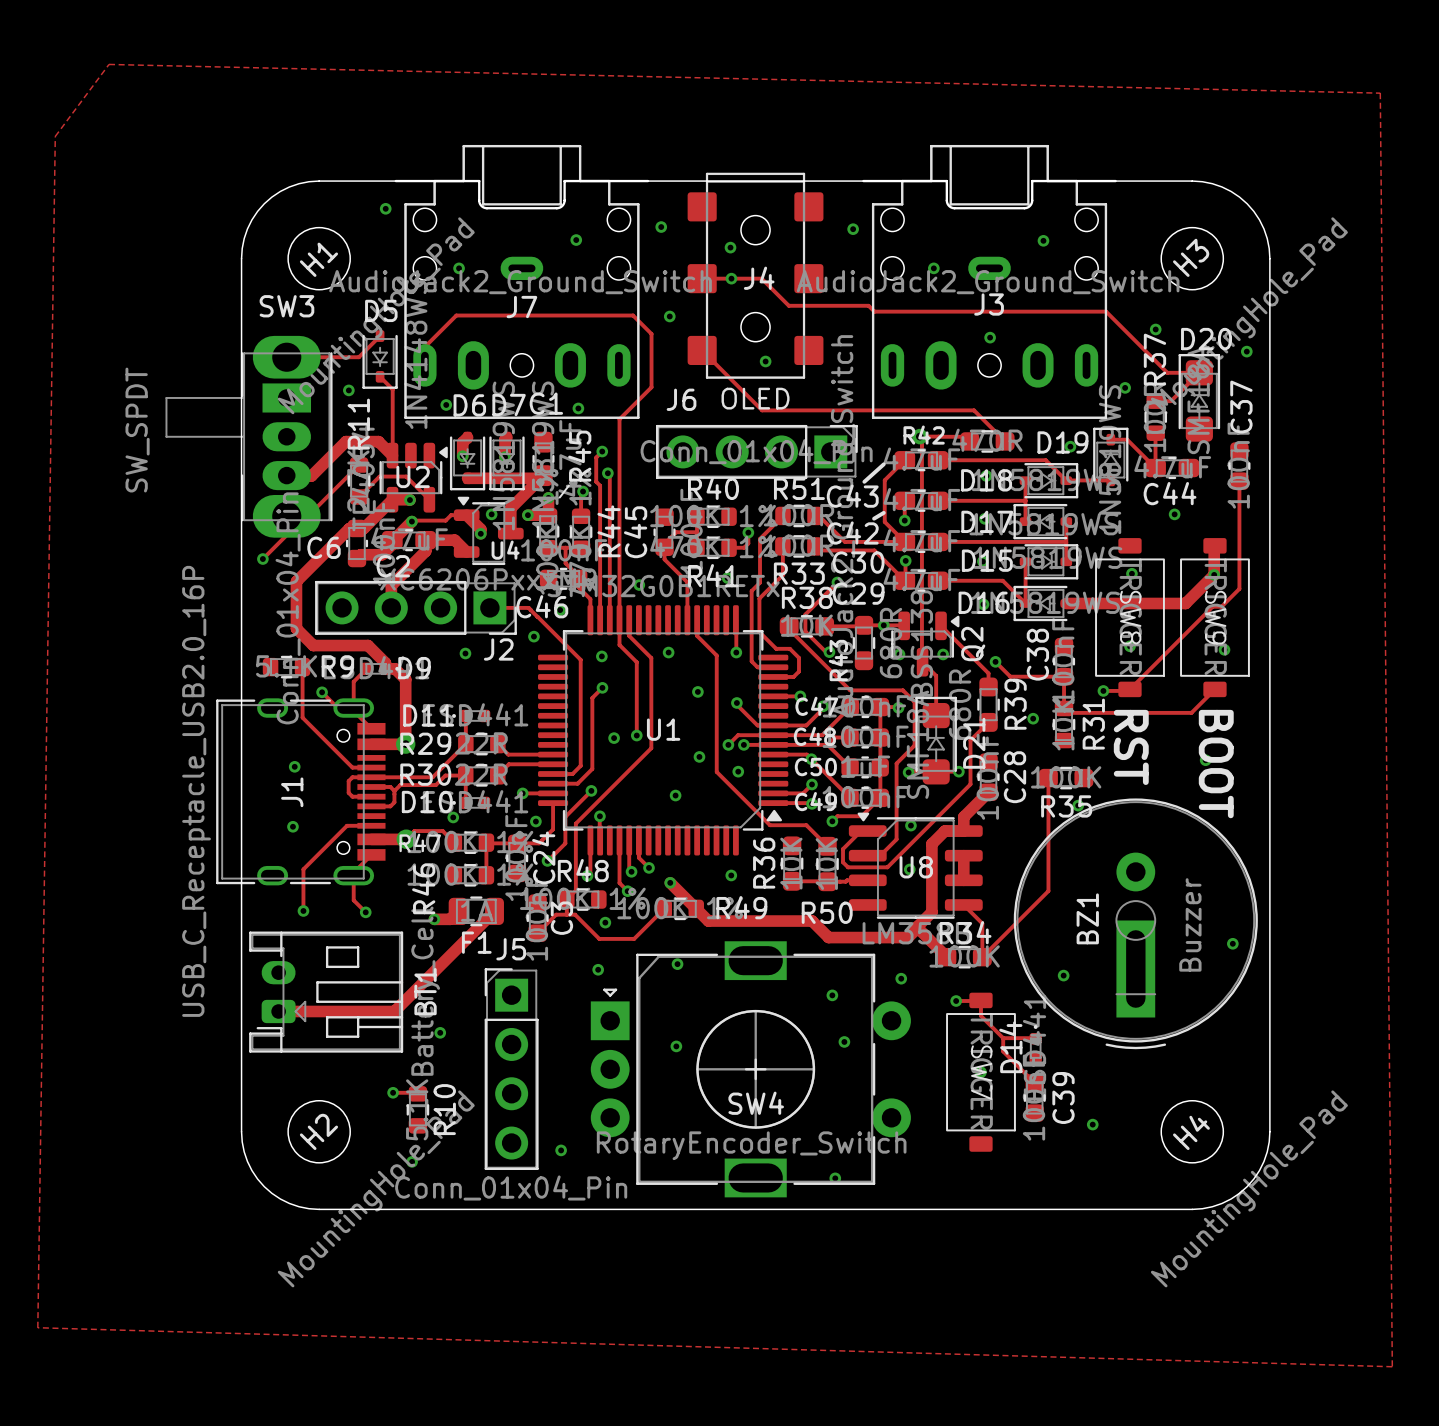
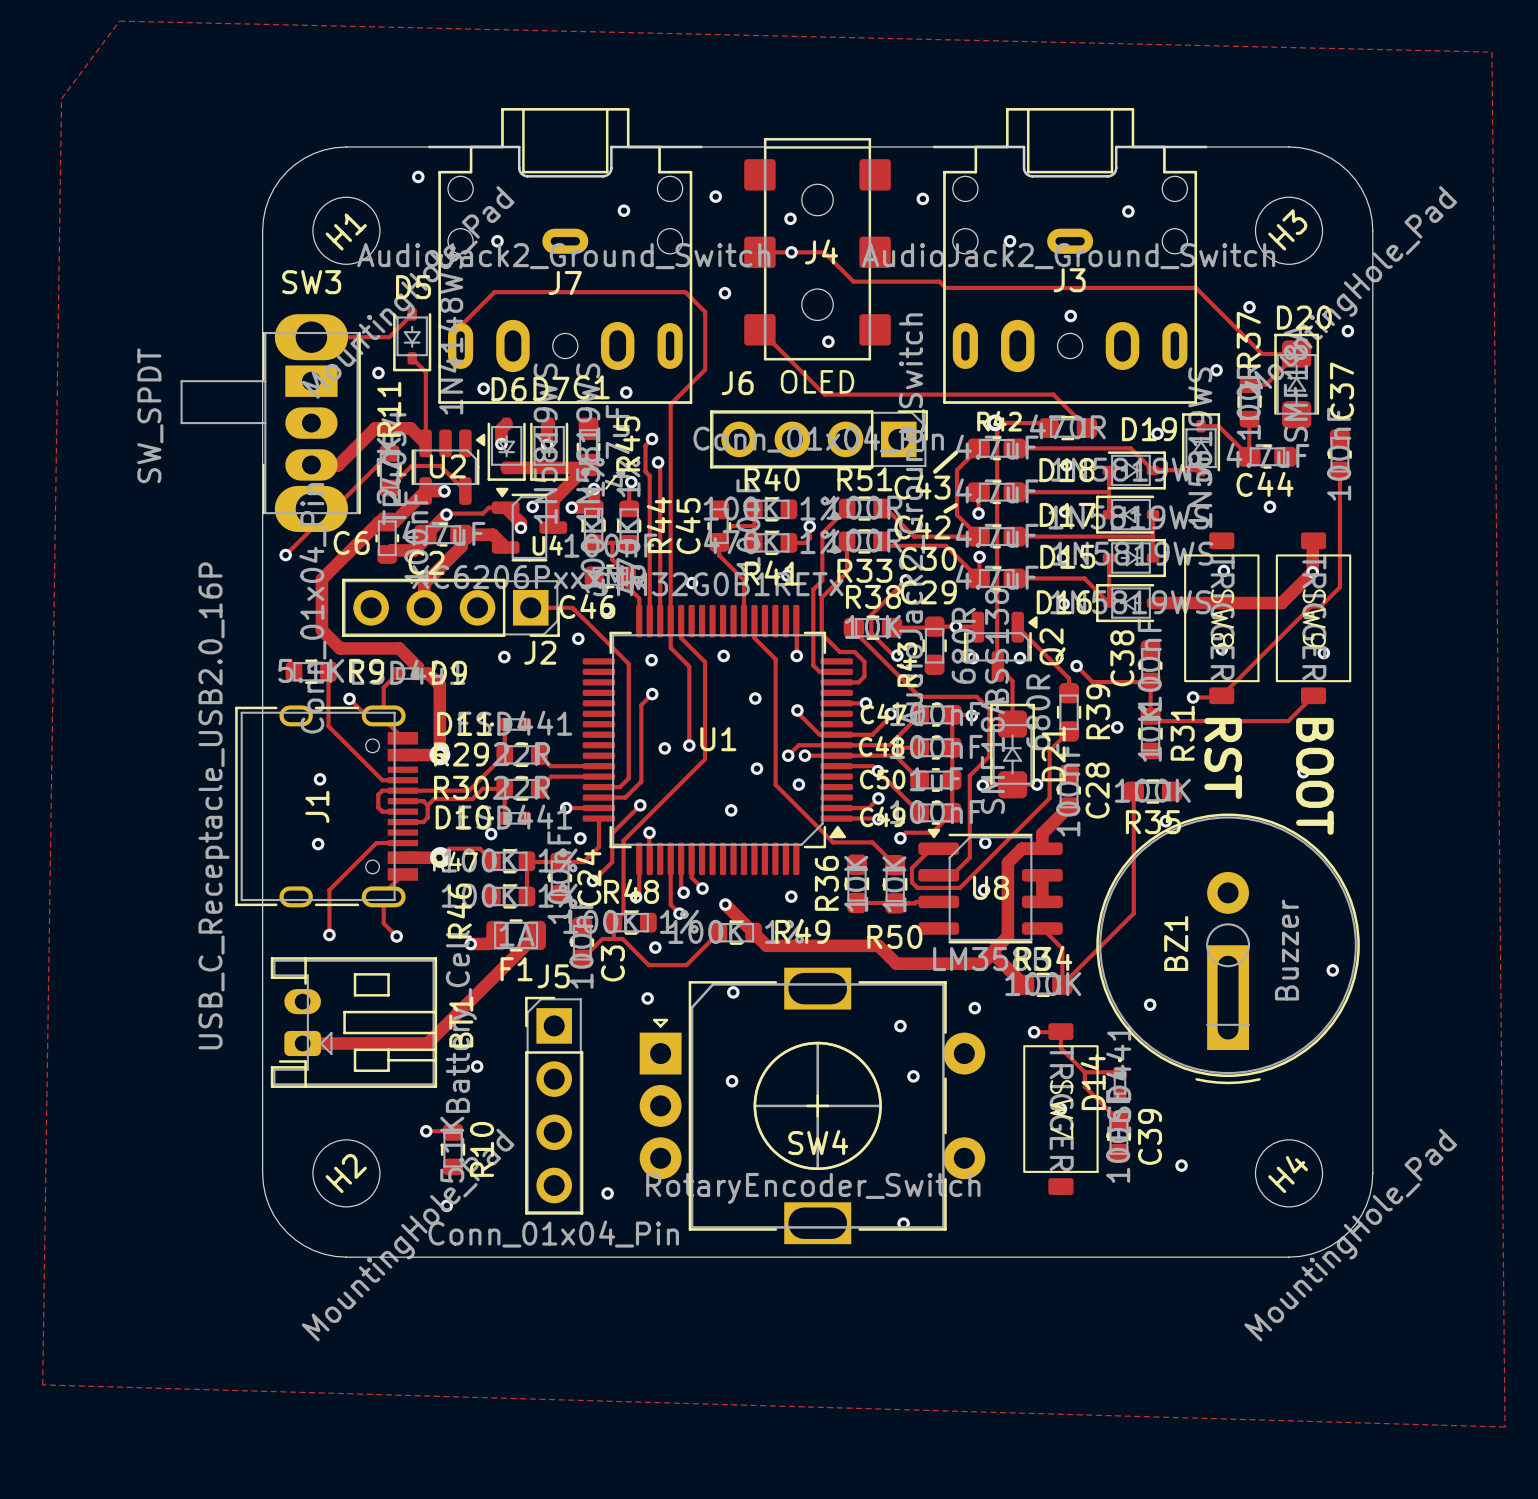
C3 name position: C3 (561, 918) -> C3 (612, 963)

